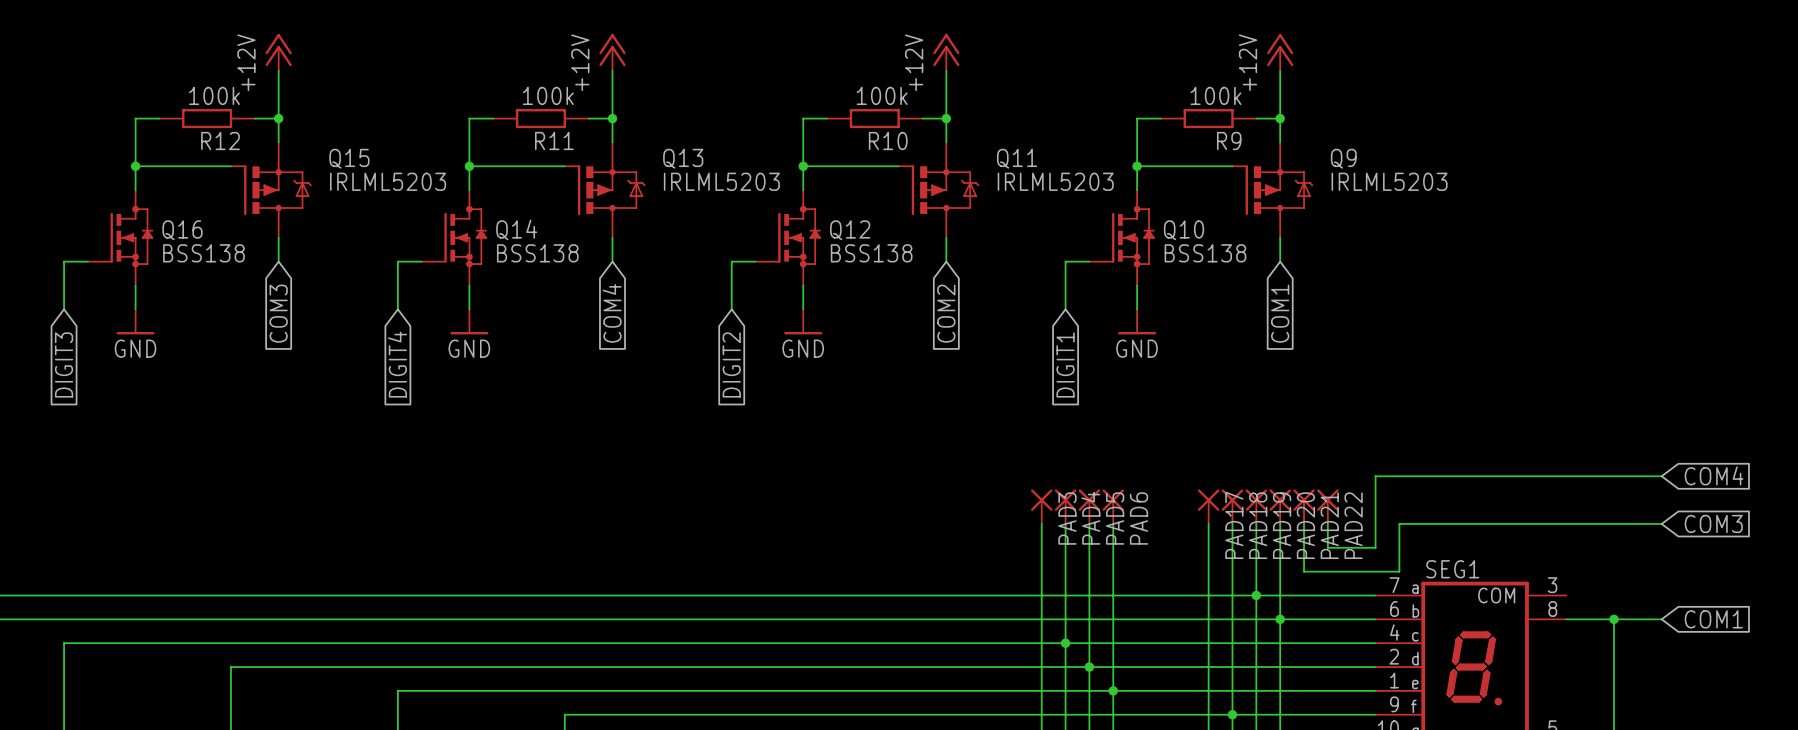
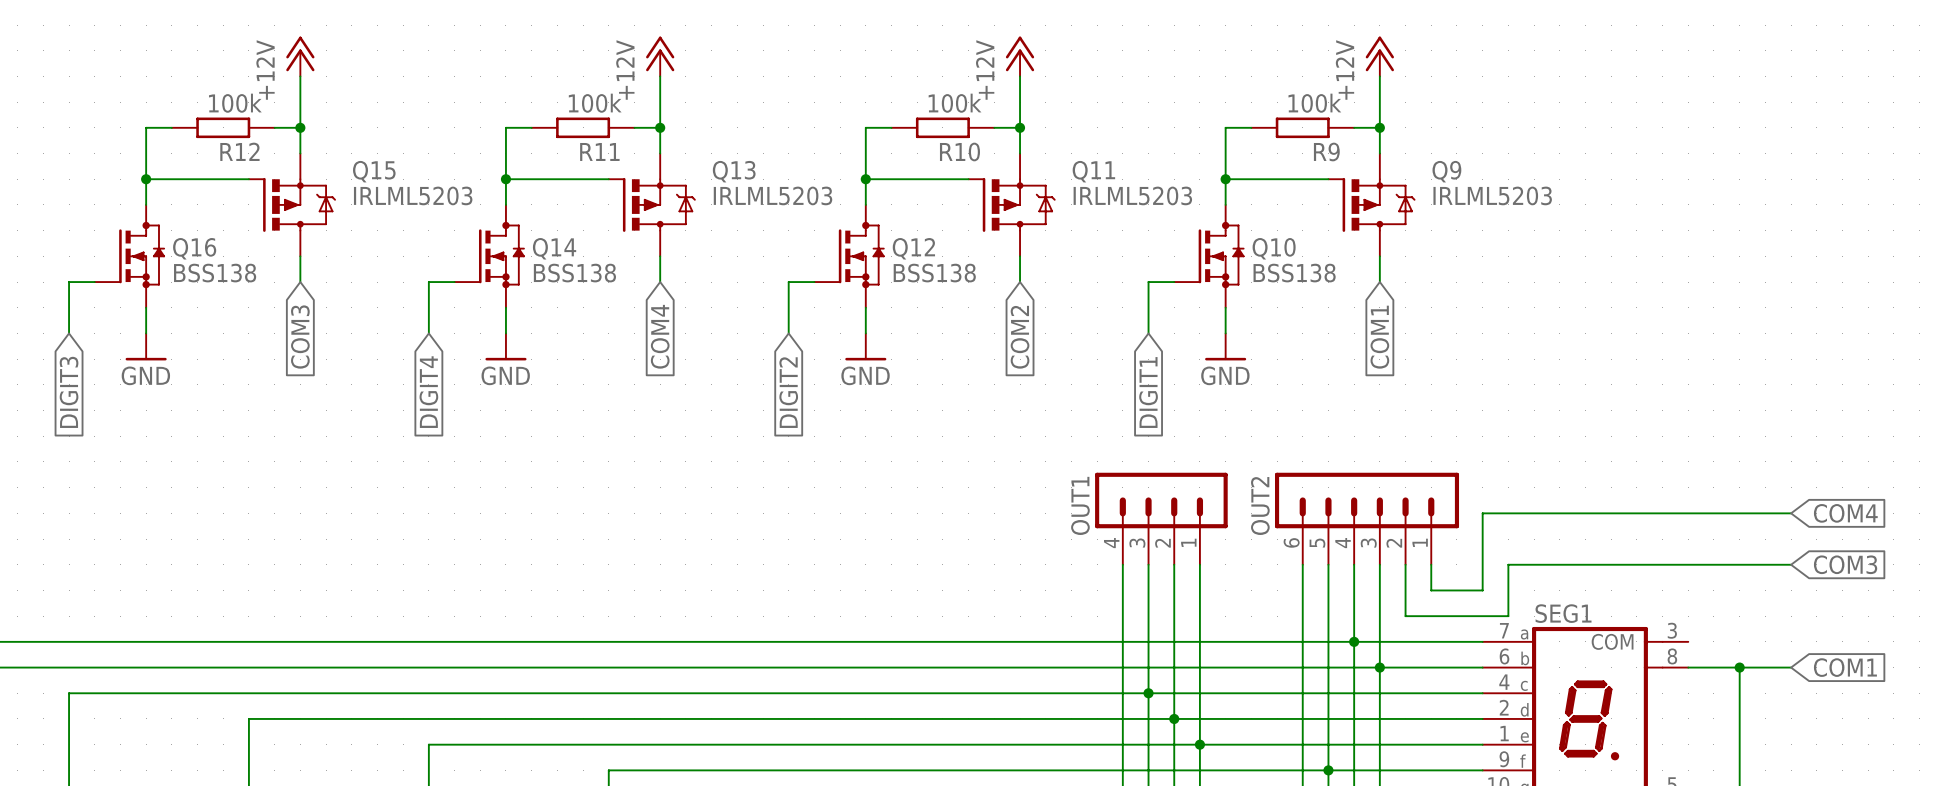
OUT1: none -> (1161, 518)
OUT2: none -> (1367, 518)
PAD3: (1041, 506) -> none
PAD4: (1065, 506) -> none
PAD5: (1089, 506) -> none
PAD6: (1113, 506) -> none
PAD17: (1208, 506) -> none
PAD18: (1232, 506) -> none
PAD19: (1256, 506) -> none
PAD20: (1280, 506) -> none
PAD21: (1304, 506) -> none
PAD22: (1327, 506) -> none

